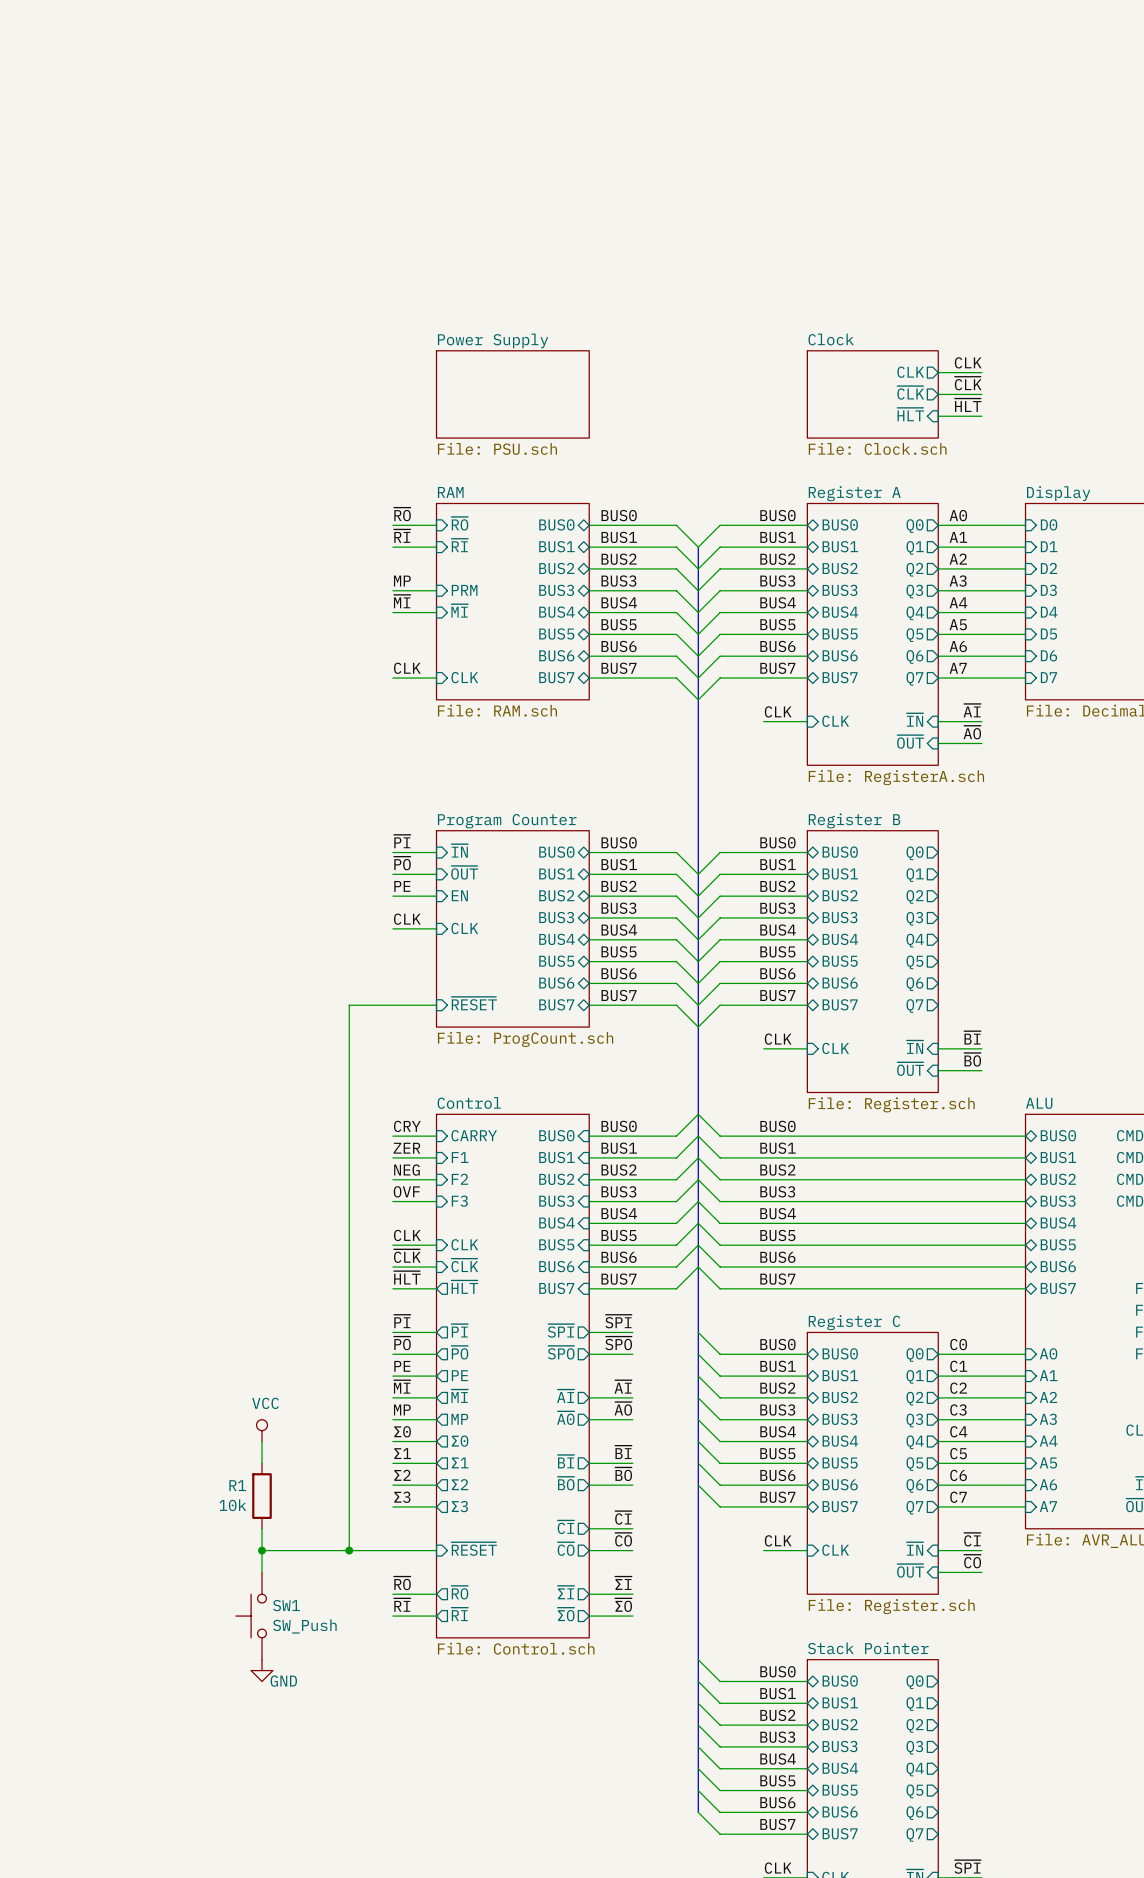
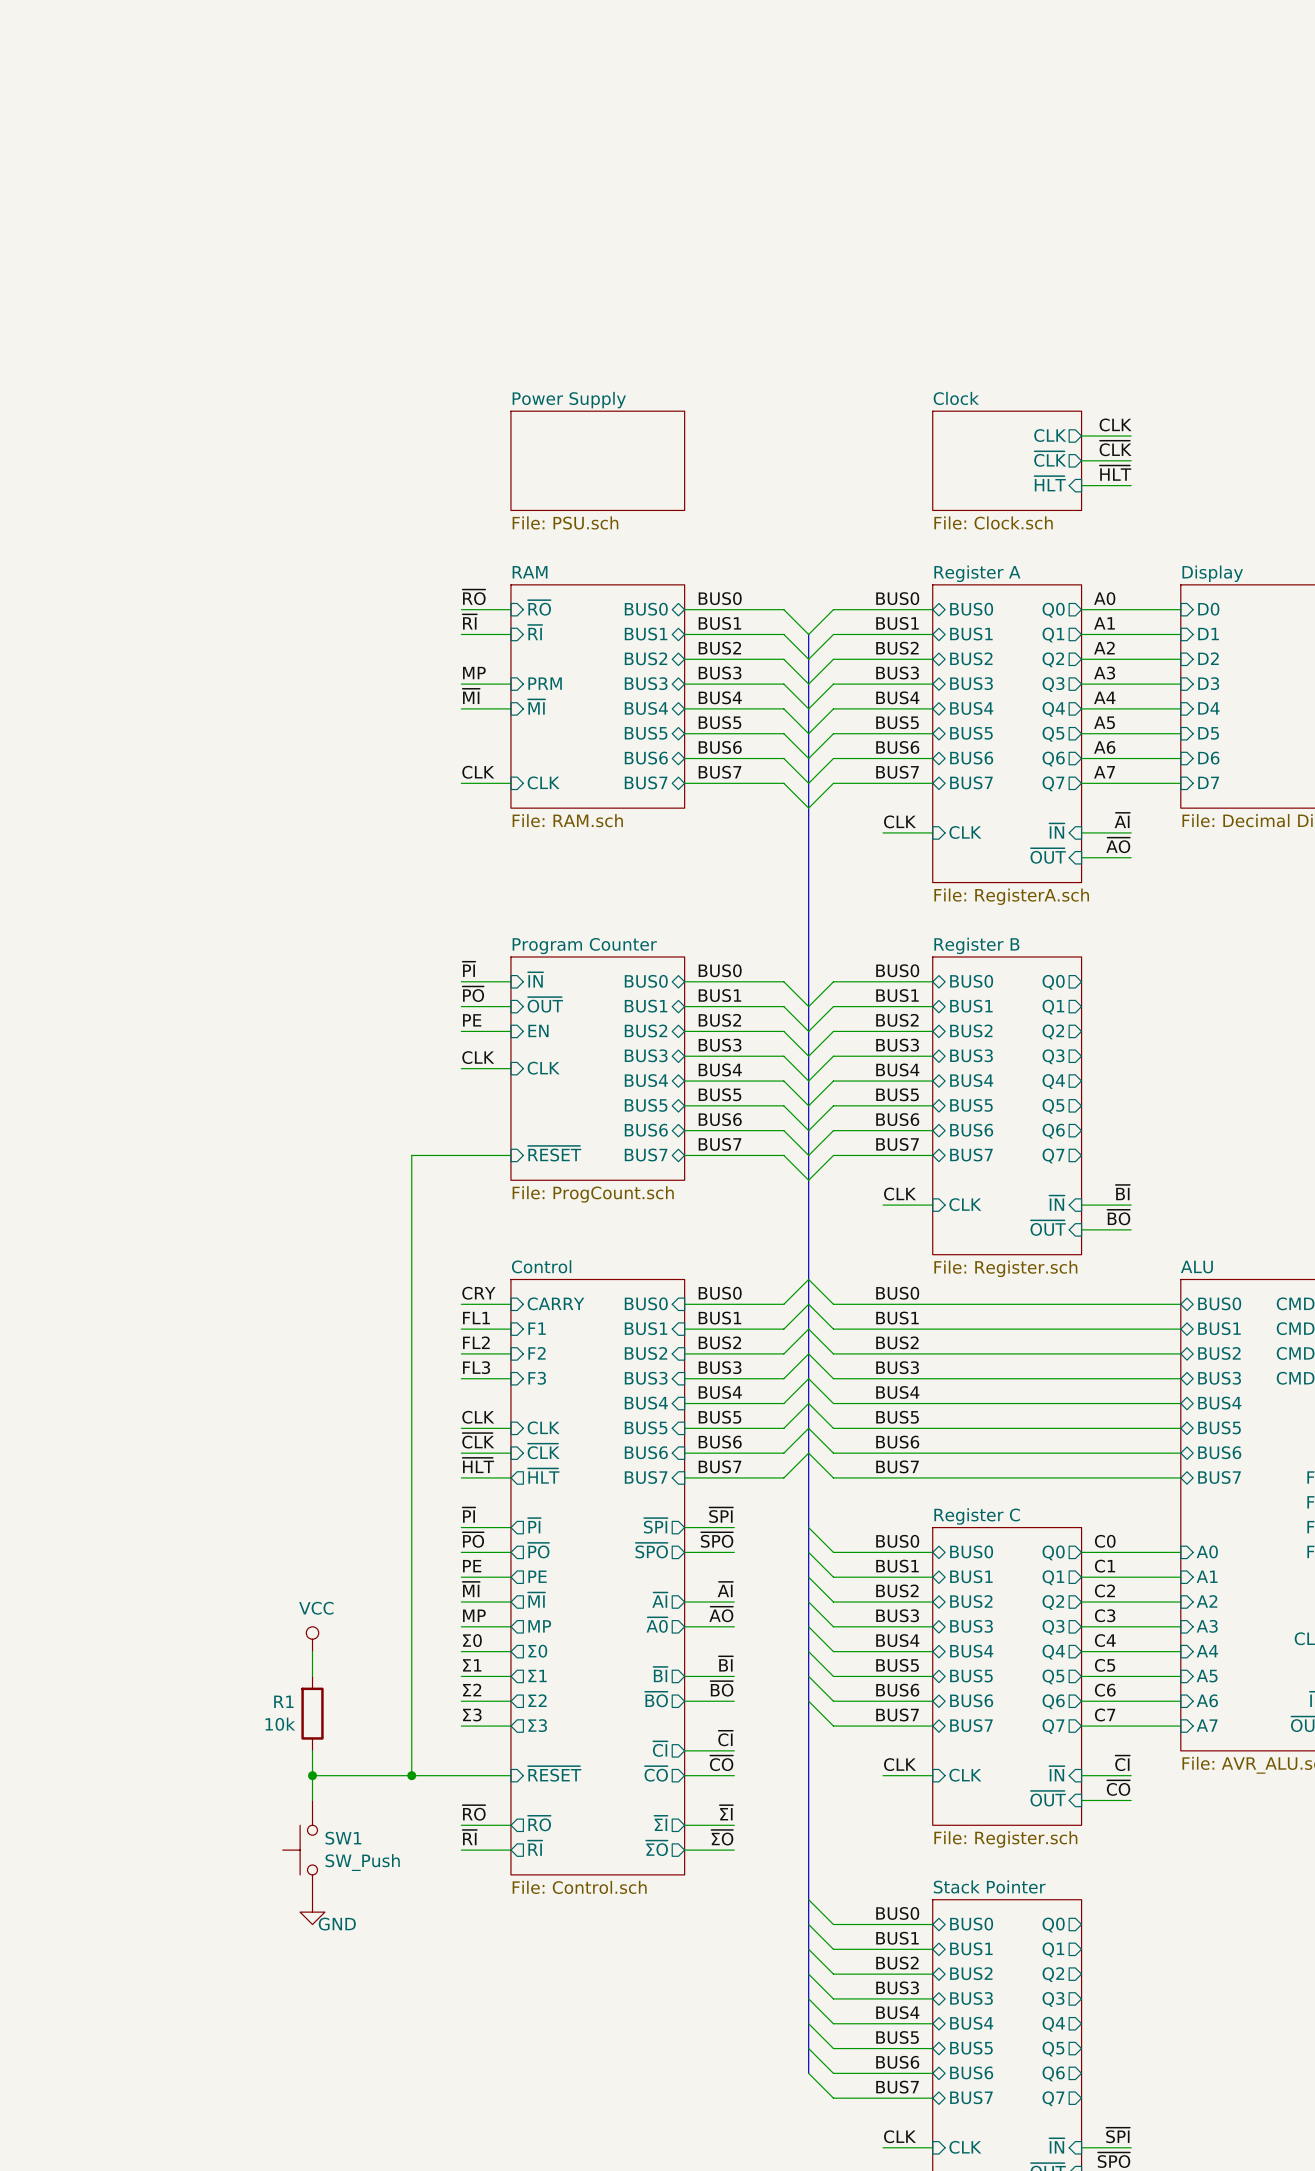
label: ZER (406, 1148) -> FL1 (476, 1318)
label: NEG (406, 1170) -> FL2 (476, 1342)
label: OVF (406, 1191) -> FL3 (476, 1367)

